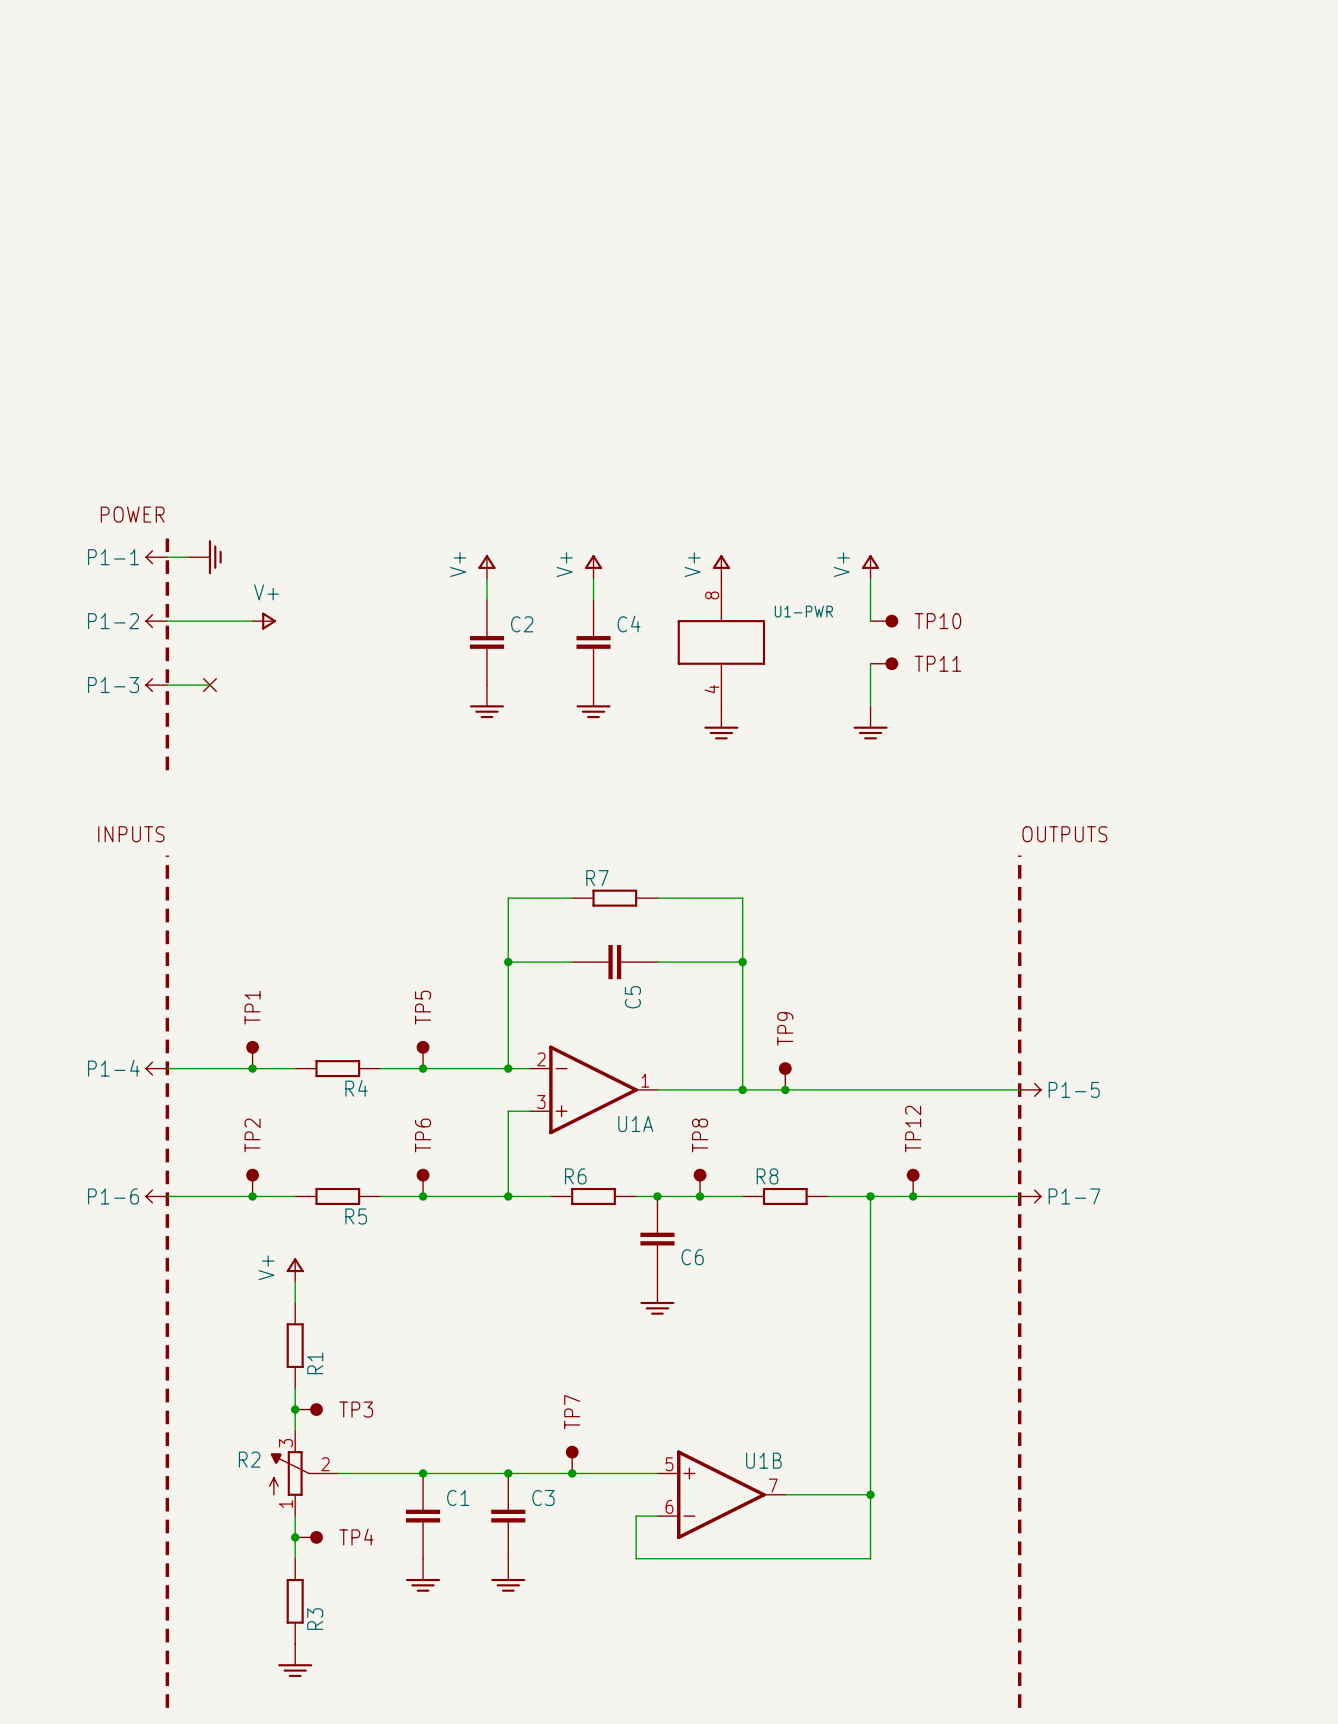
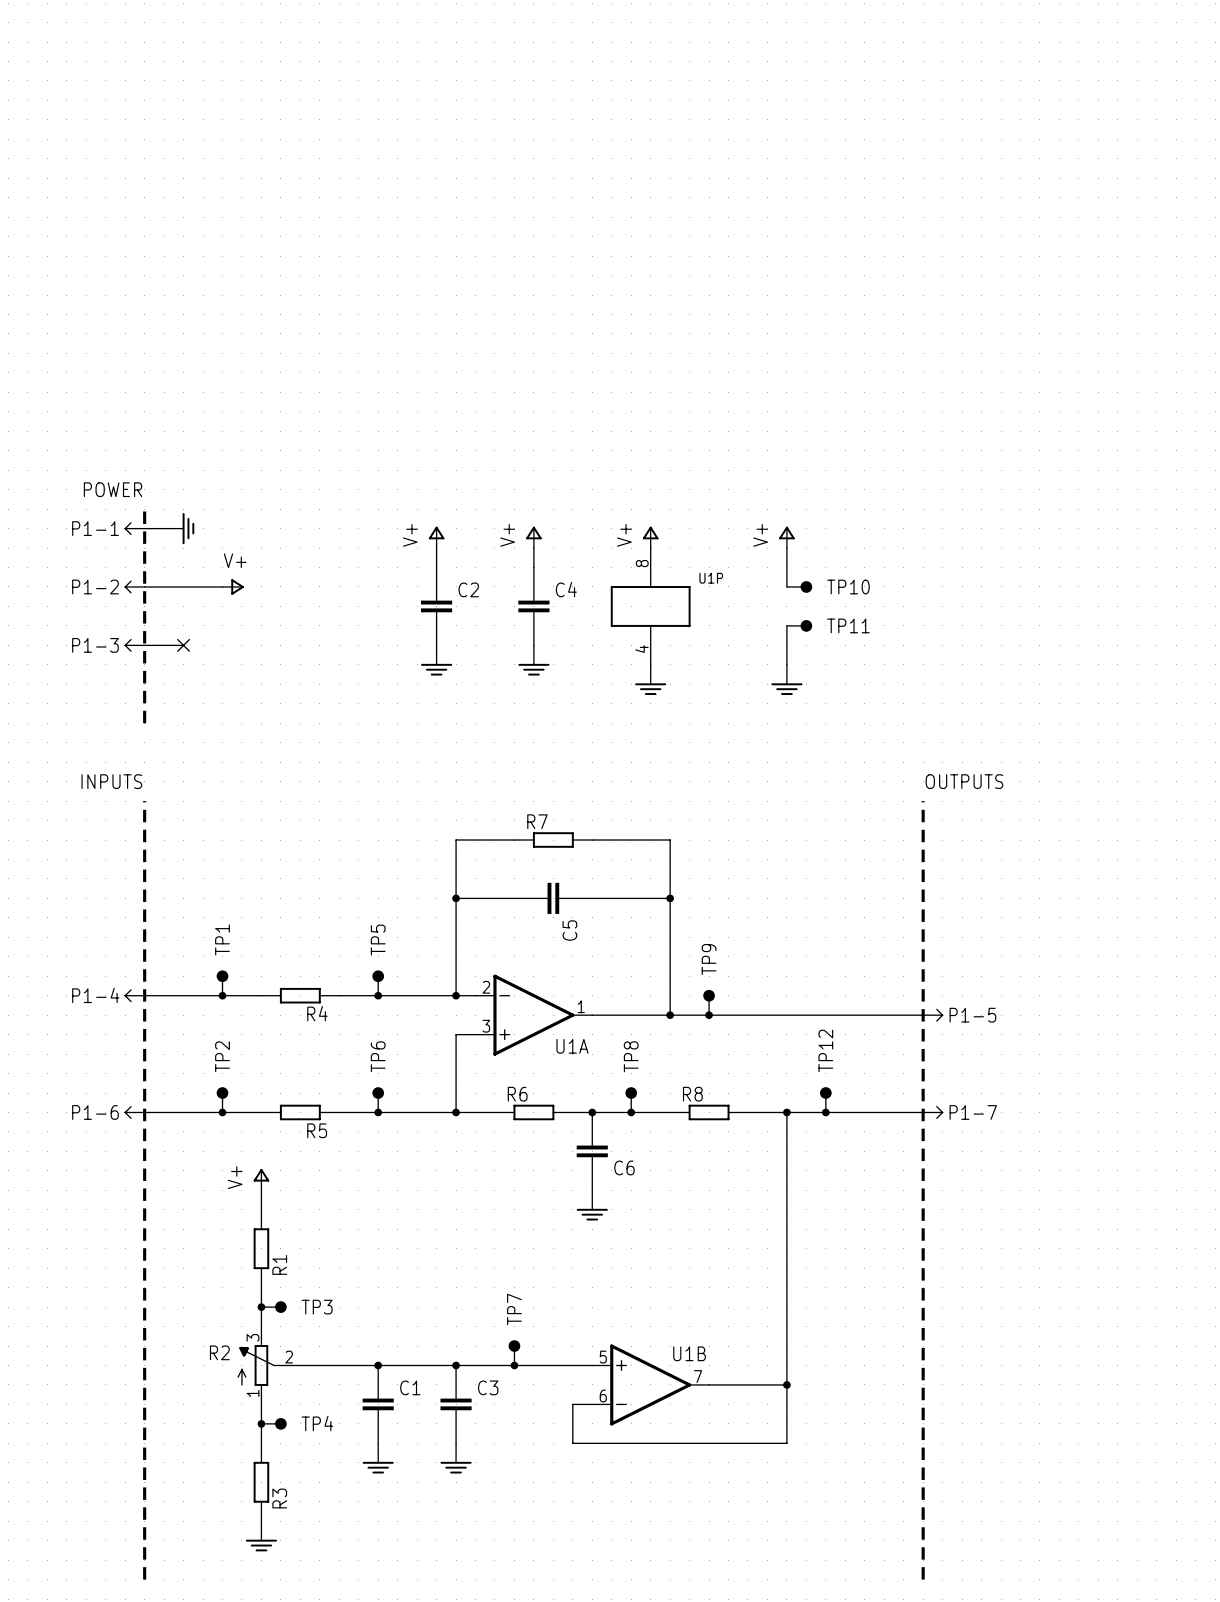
U1-PWR name: U1-PWR (803, 611) -> U1P (711, 578)

